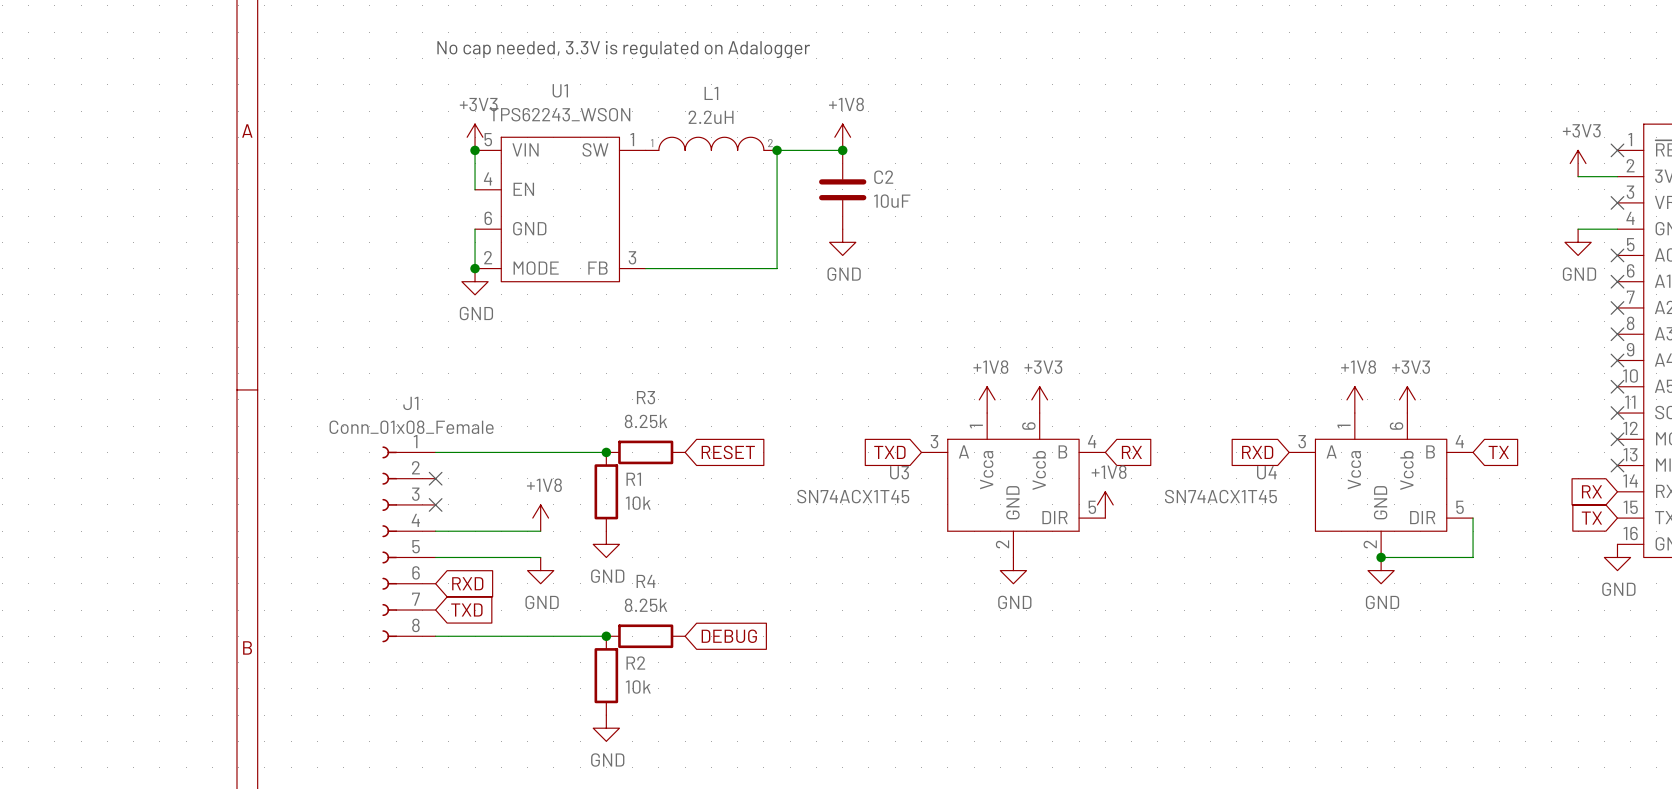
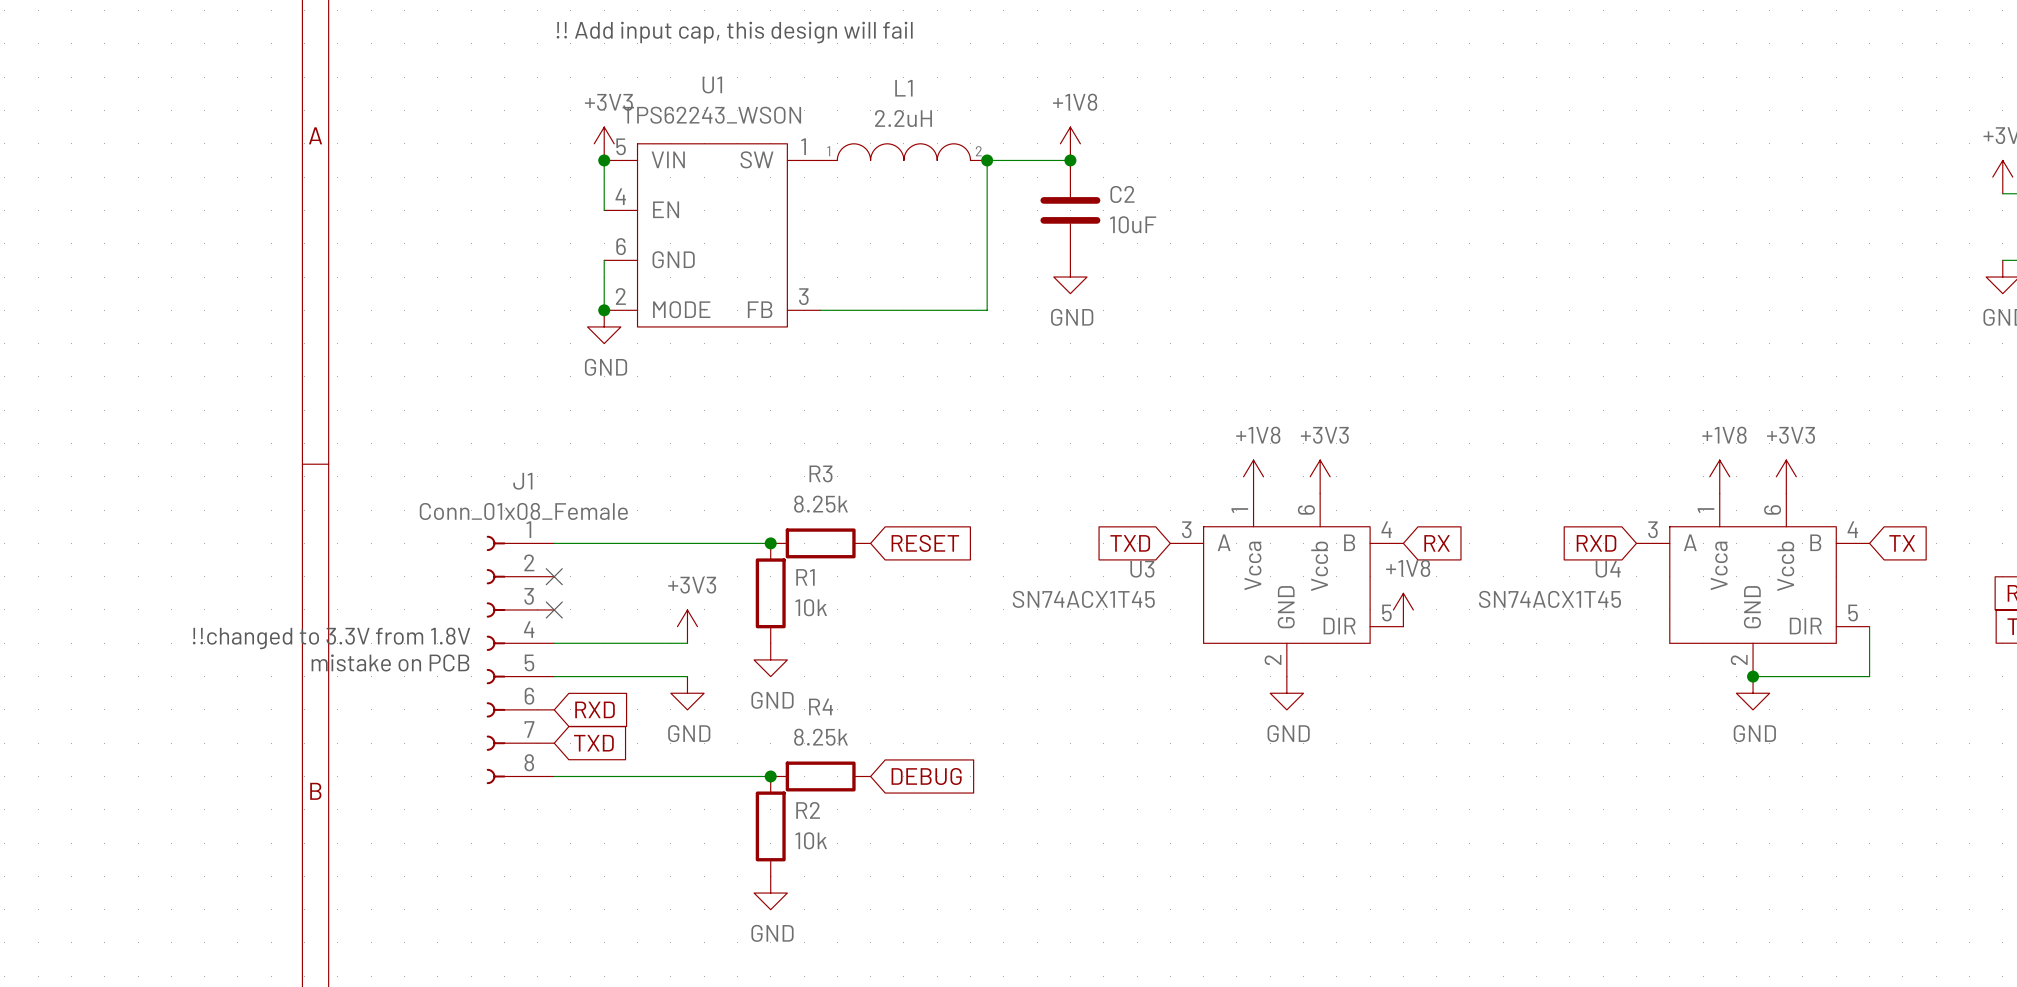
text: No cap needed, 3.3V is regulated on Adalogger (623, 49) -> !! Add input cap, this design will fail (734, 32)
power symbol: +1V8 (540, 518) -> +3V3 (687, 626)
text: none -> !!changed to 3.3V from 1.8V (331, 638)
text: none -> mistake on PCB (390, 662)

